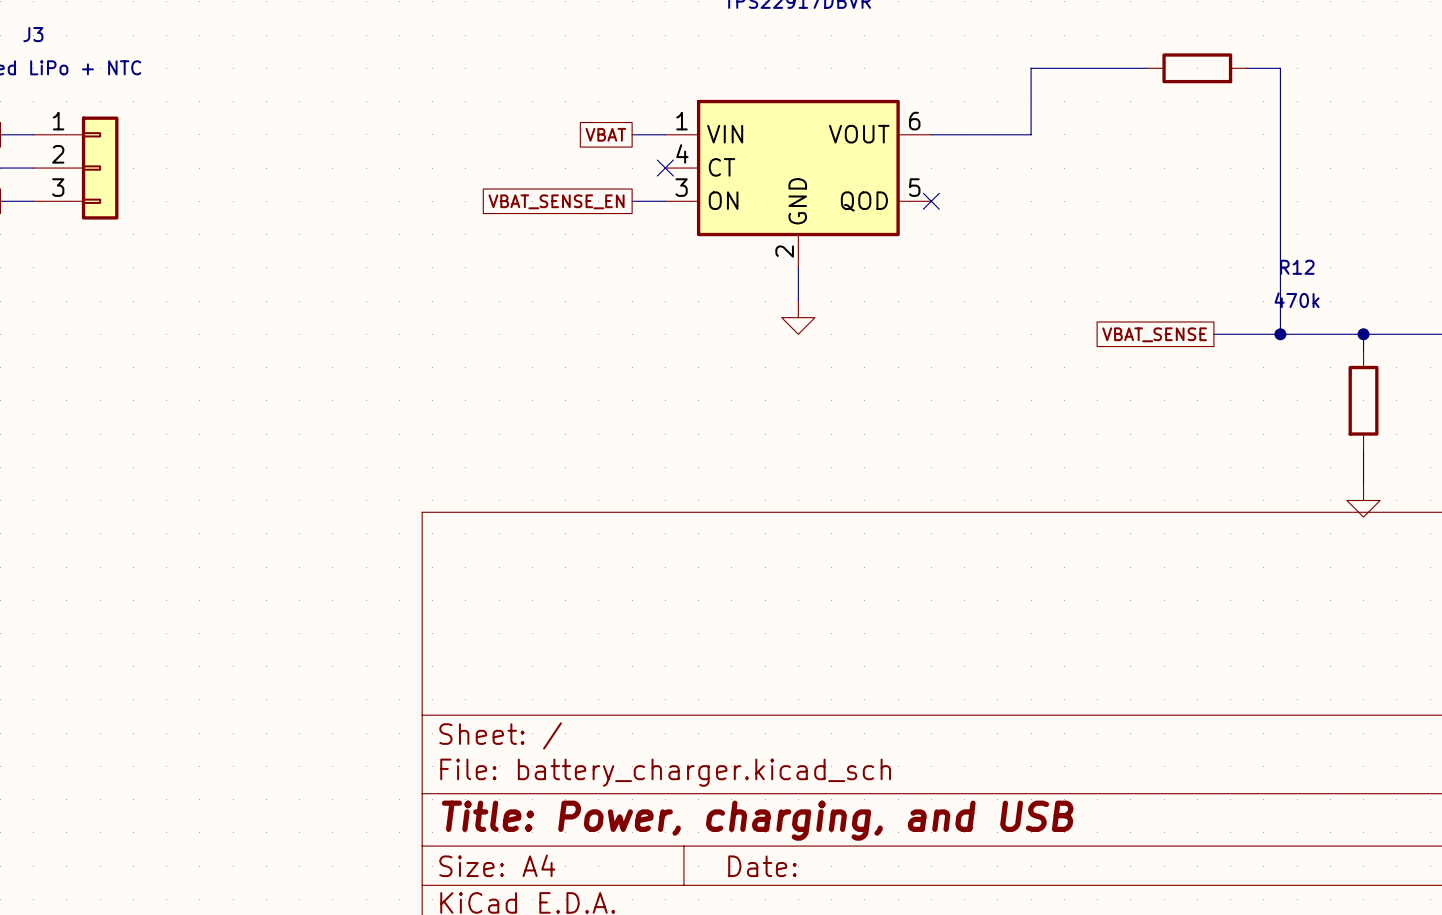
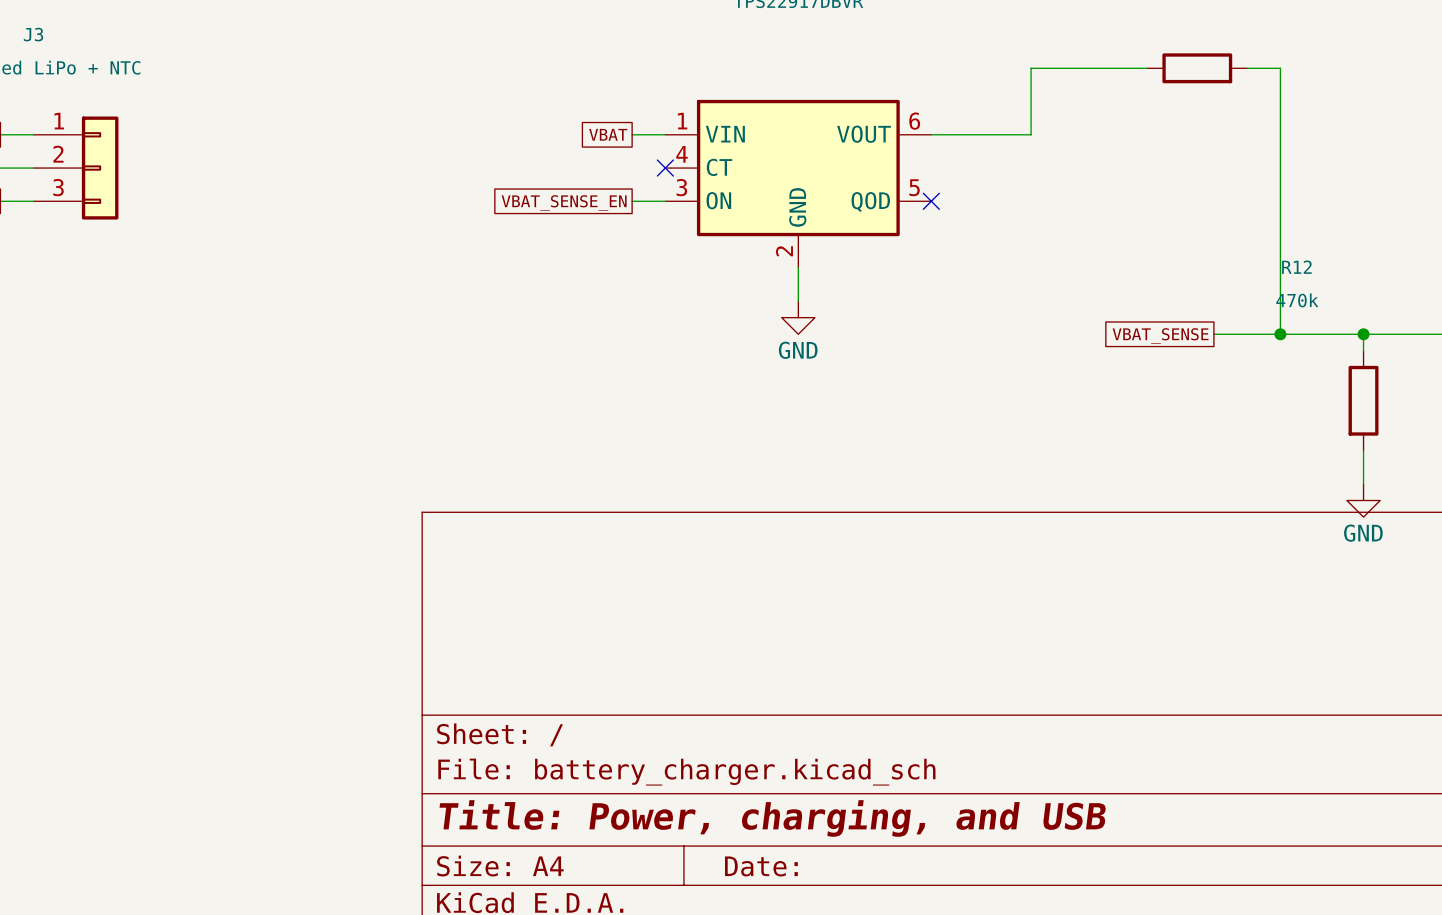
power symbol text: none -> GND (798, 350)
power symbol text: none -> GND (1363, 533)

